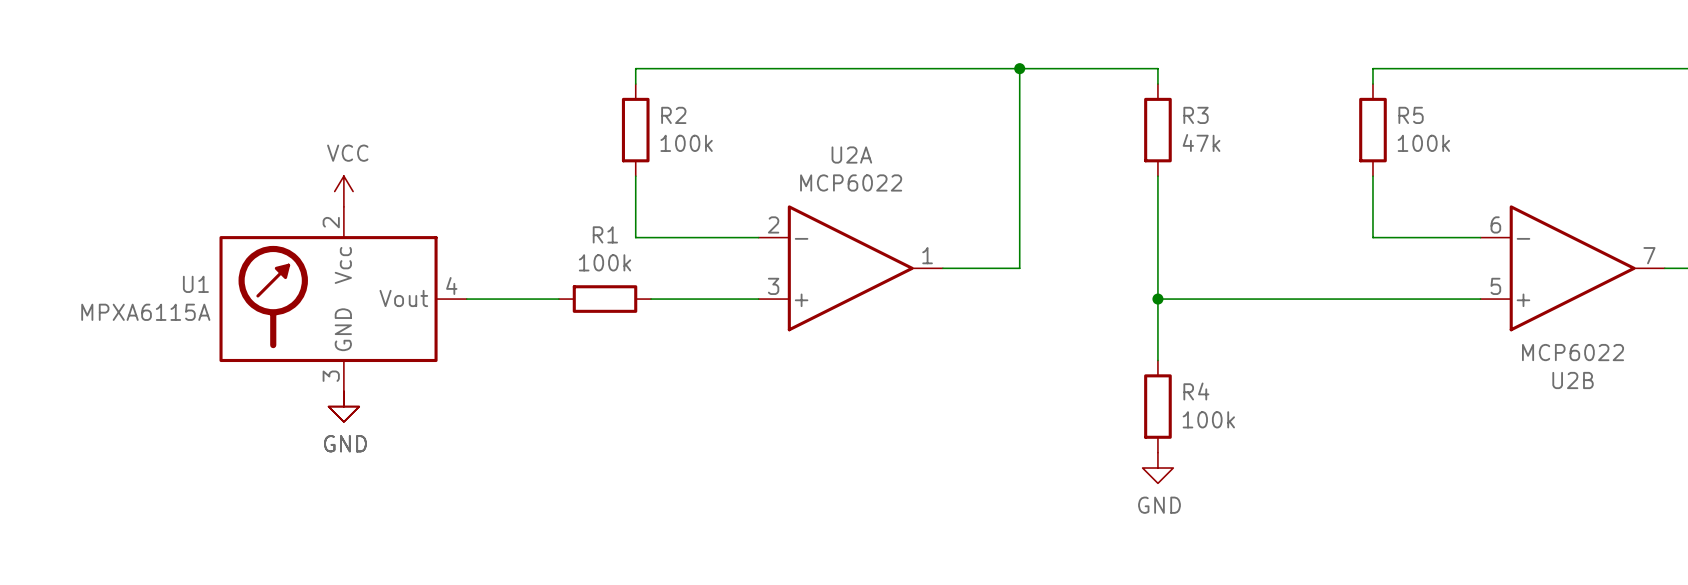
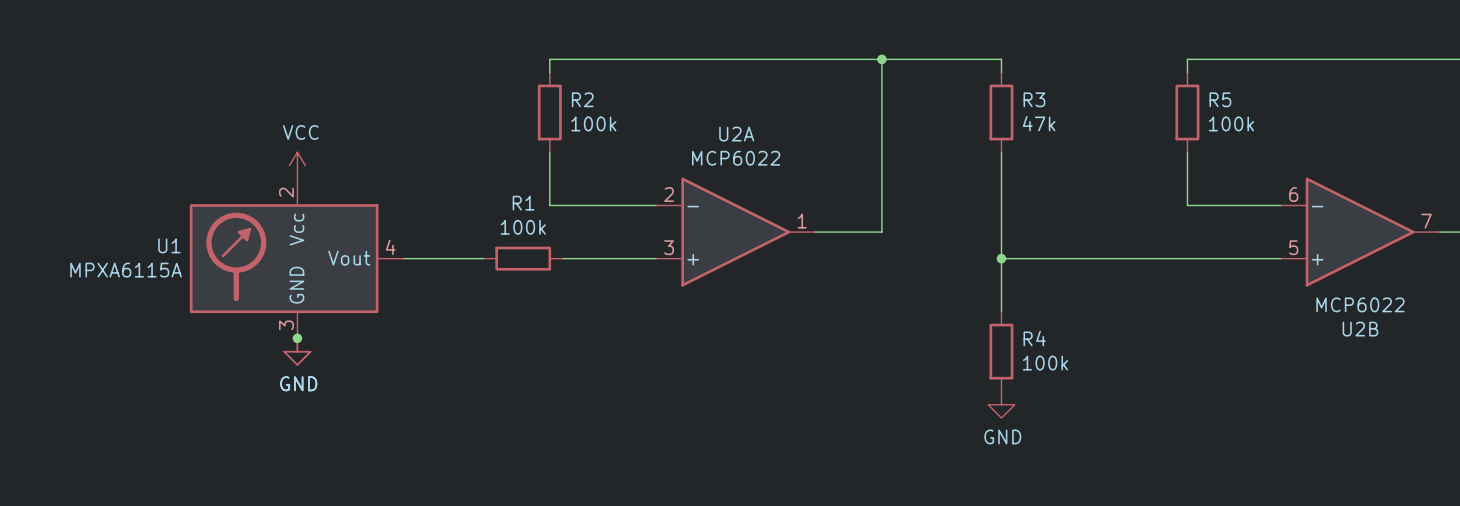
junction: none -> (297, 338)

